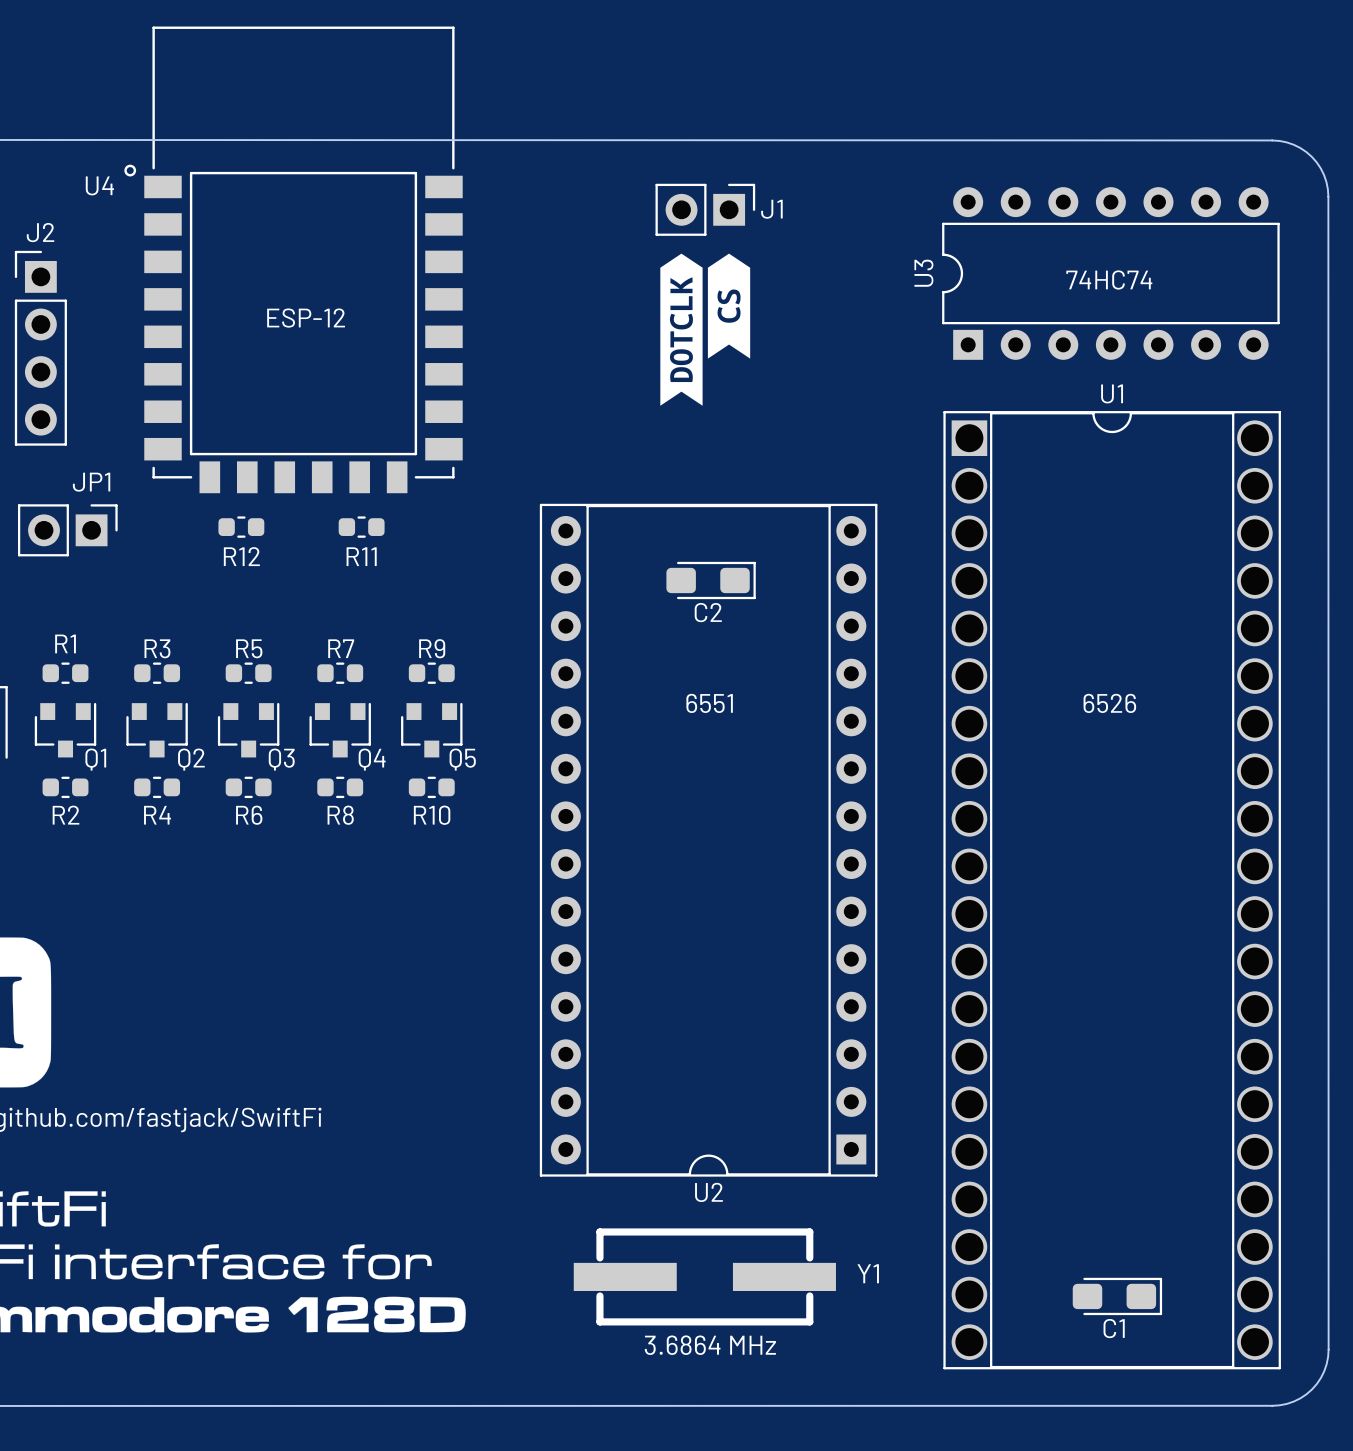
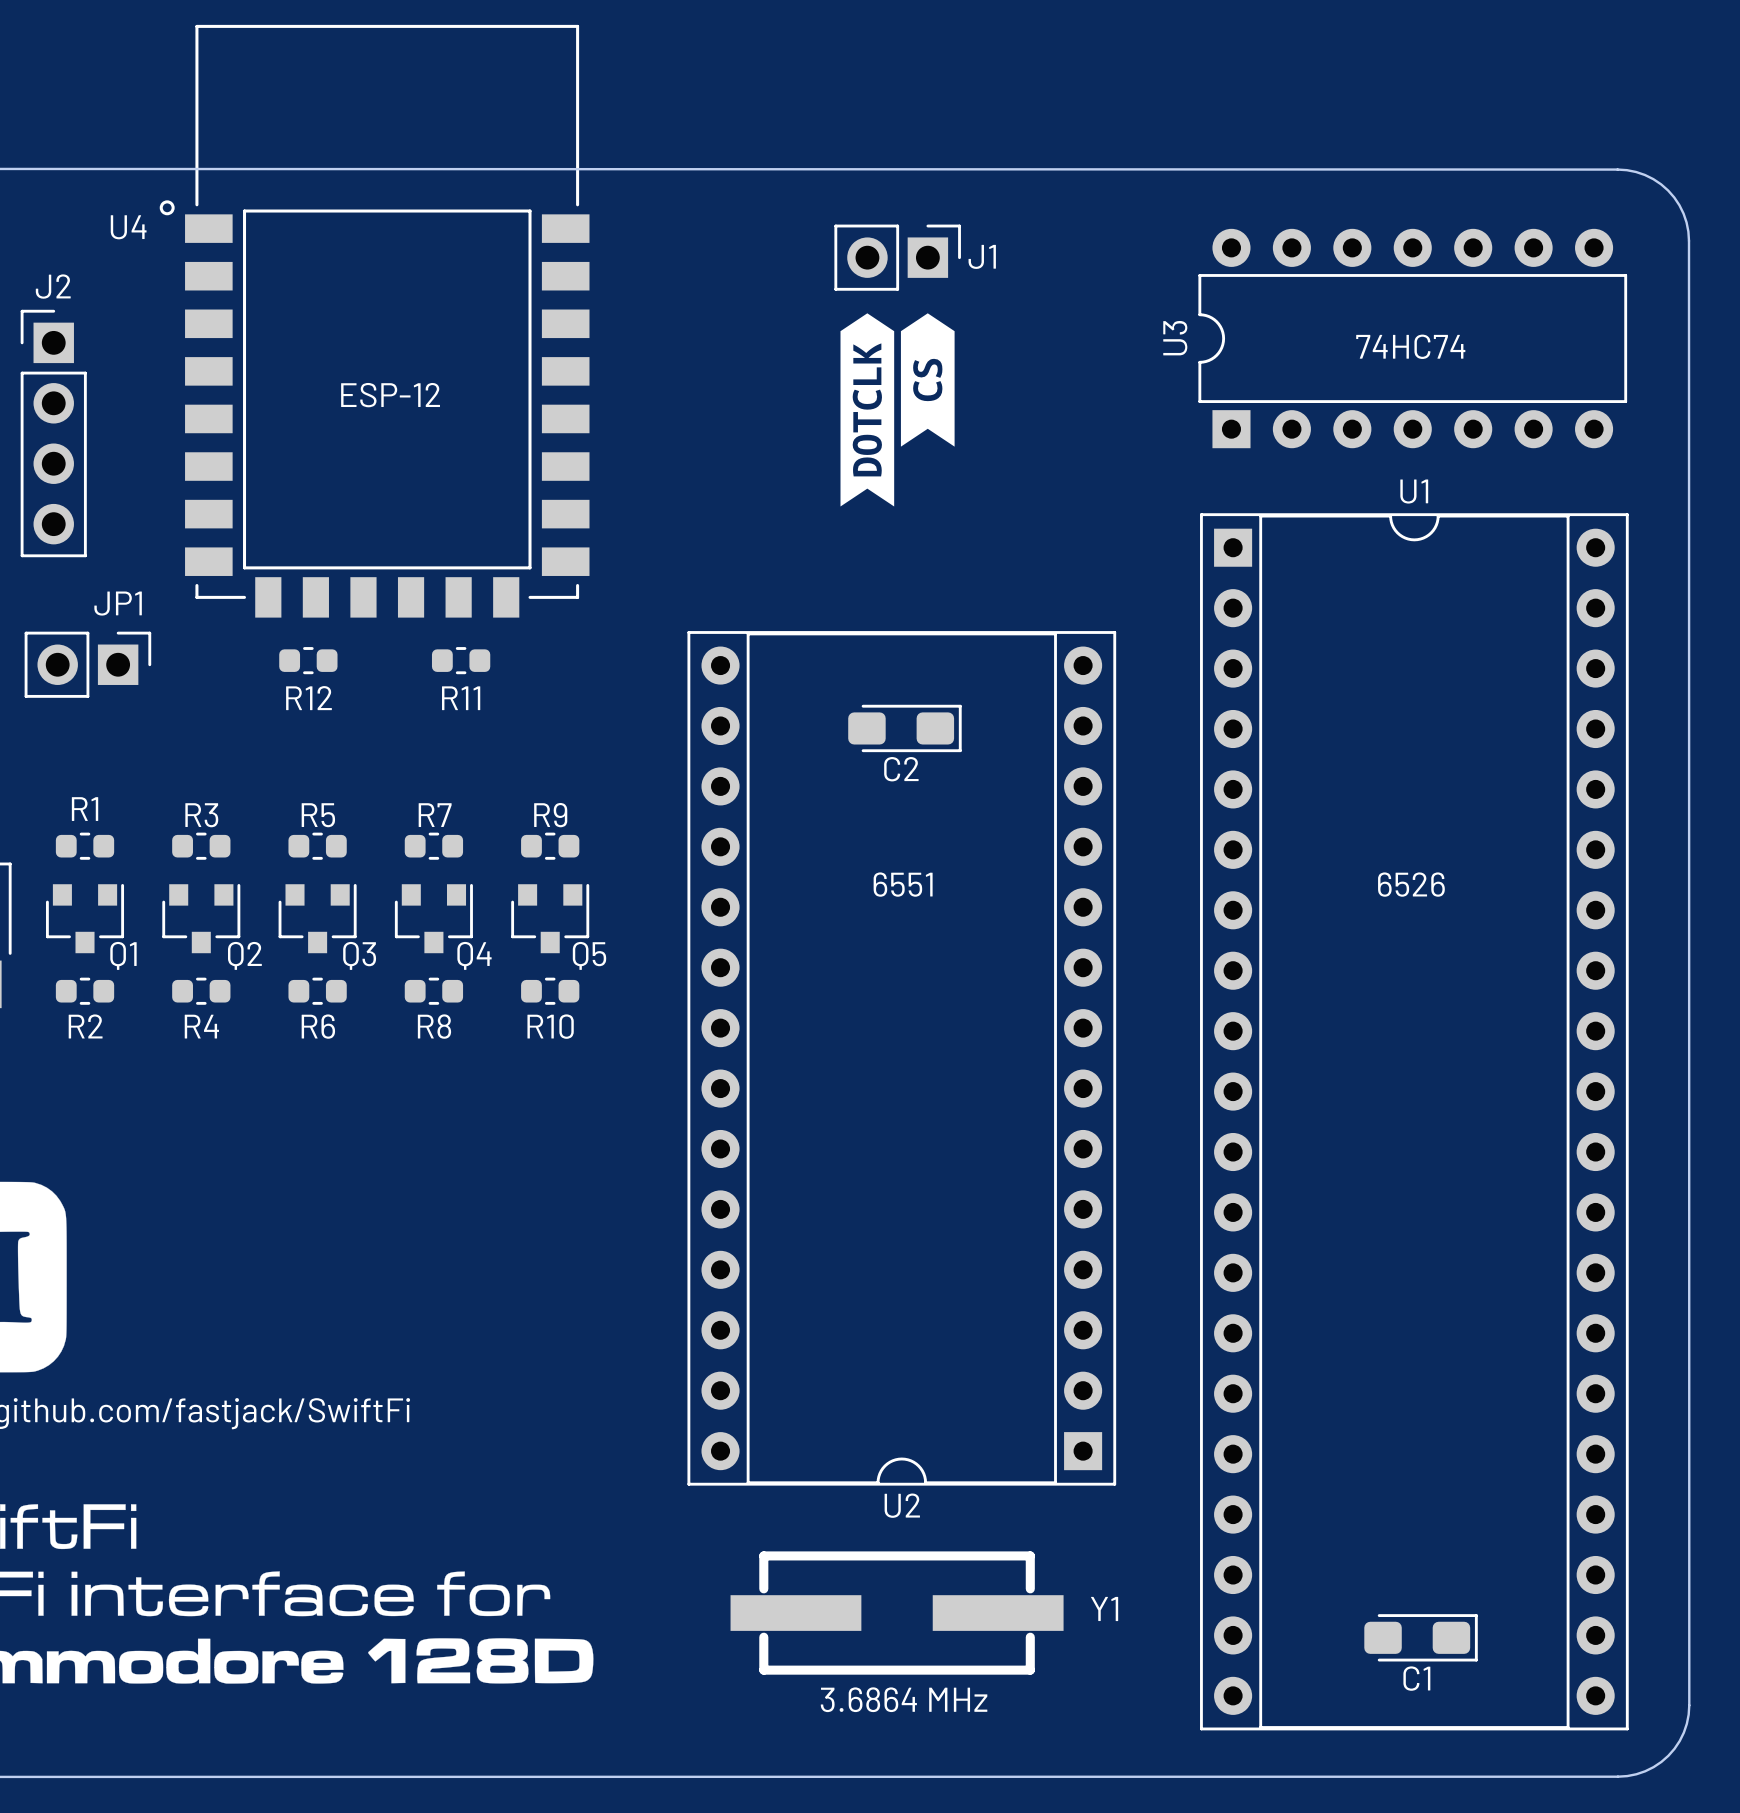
U1 footprint: [943, 411, 1281, 1370] -> [1200, 513, 1629, 1731]

